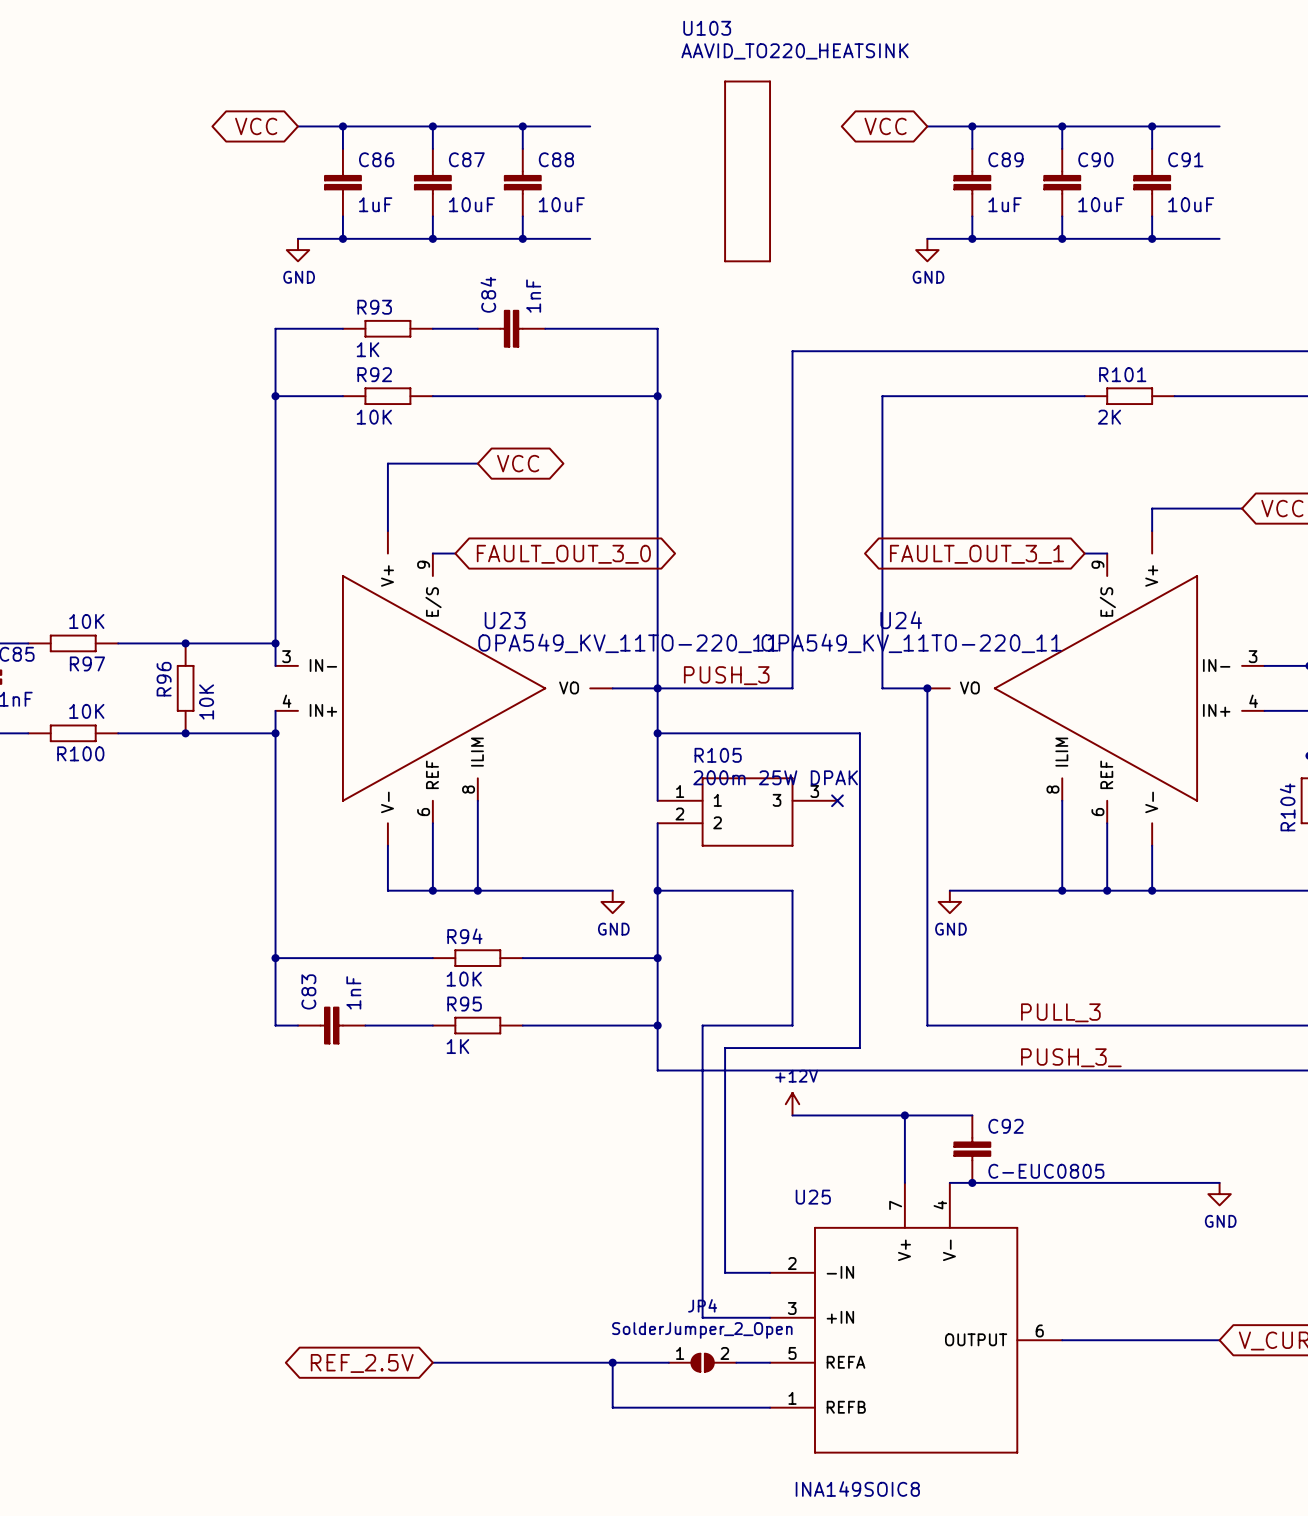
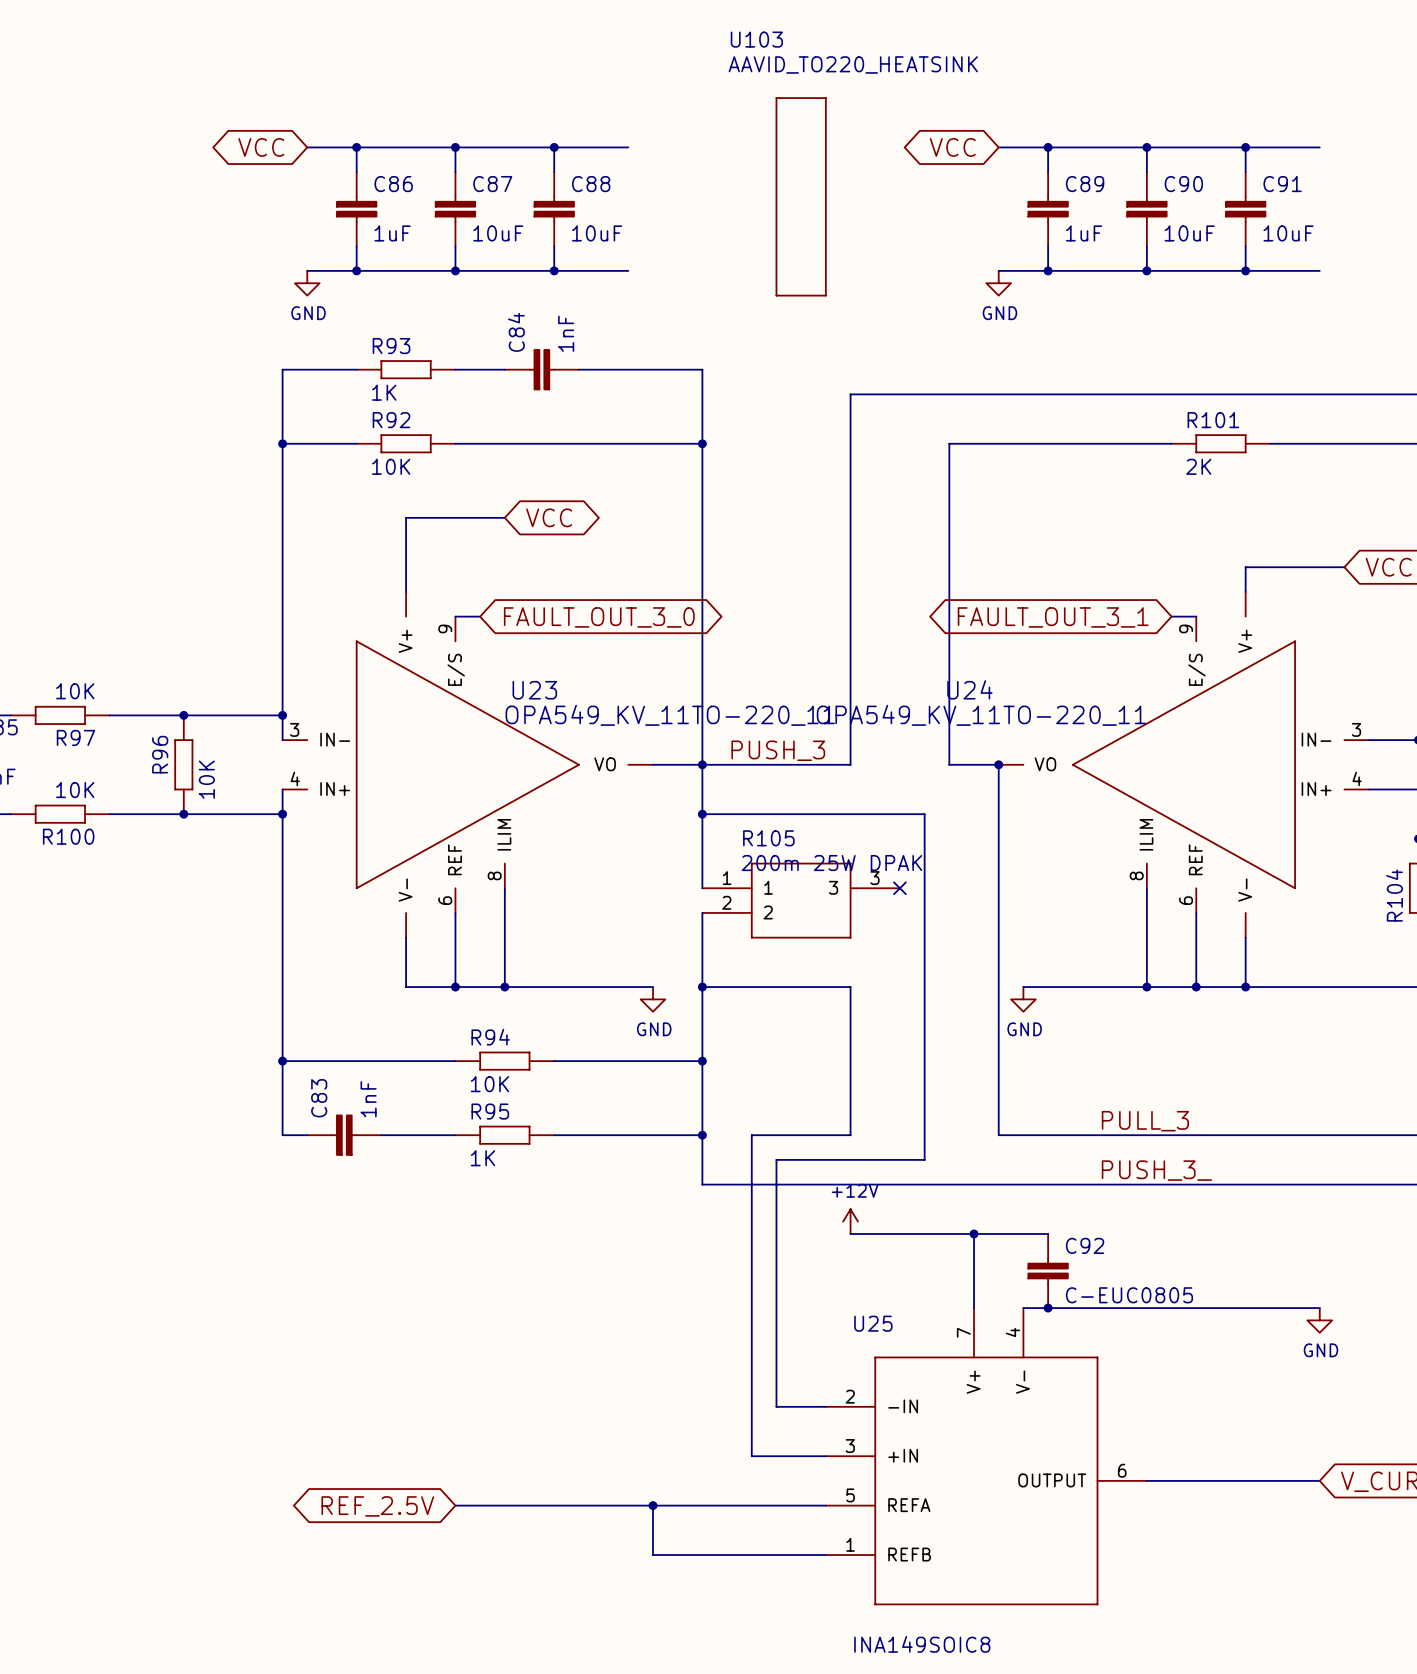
JP4: SolderJumper_2_Open (702, 1362) -> none

